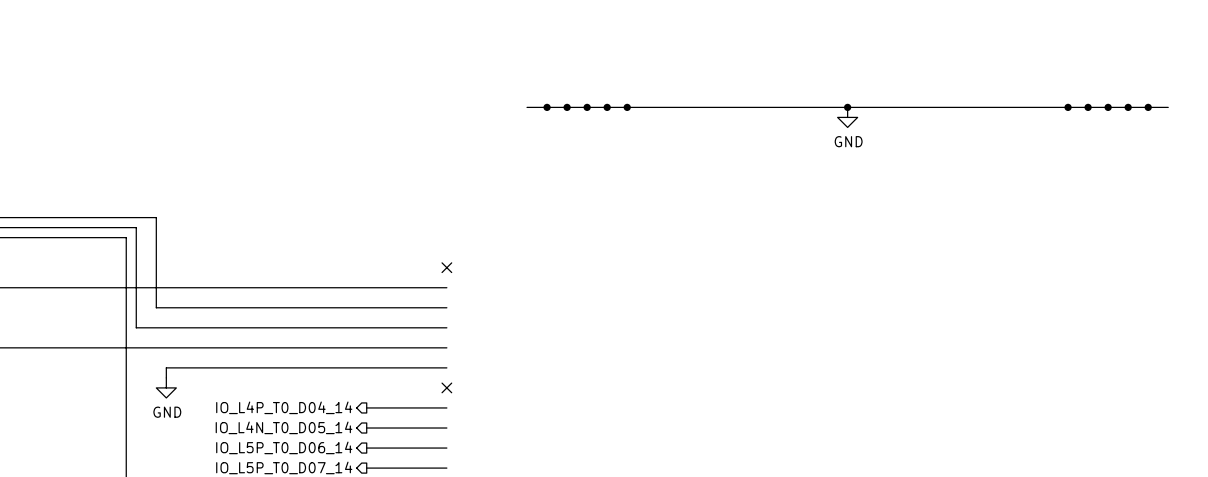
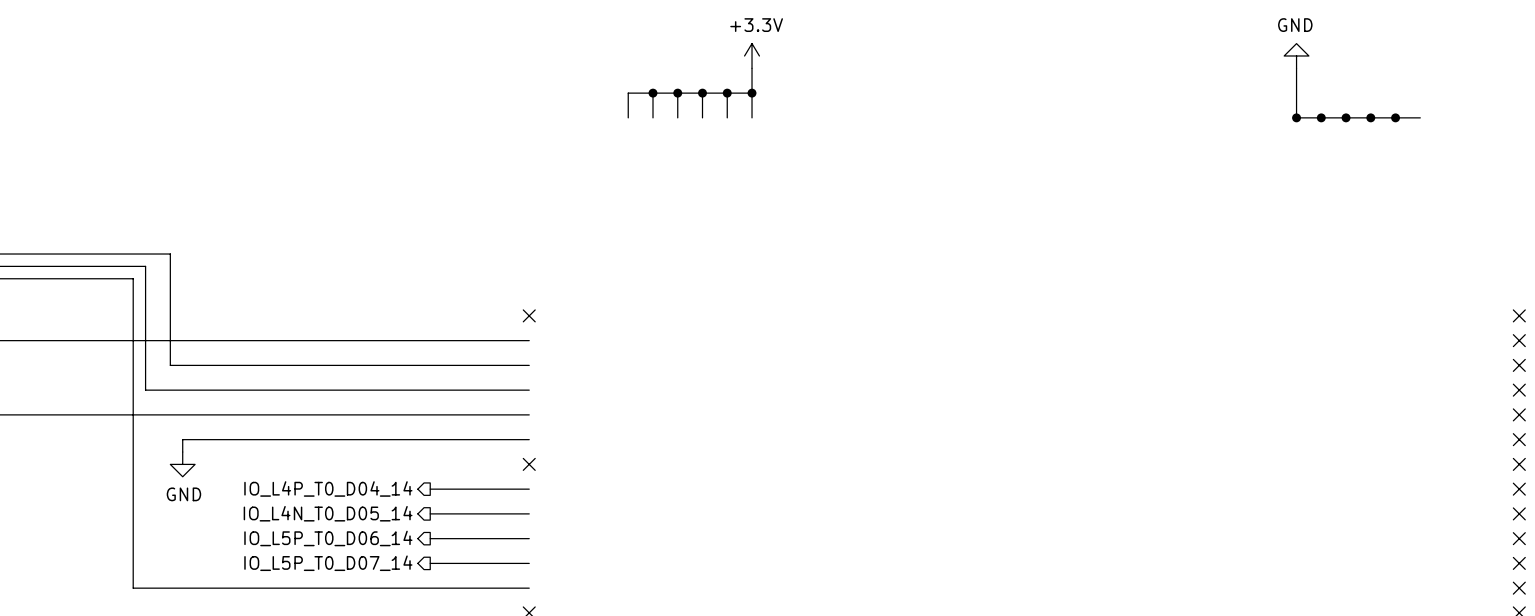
power symbol: none -> +3.3V (752, 55)
power symbol: none -> GND (1296, 55)
wire: none -> (752, 68) (752, 117)
wire: none -> (1296, 68) (1296, 117)
wire: none -> (653, 93) (653, 117)
junction: none -> (653, 93)
wire: none -> (677, 93) (677, 117)
junction: none -> (677, 93)
wire: none -> (702, 93) (702, 117)
junction: none -> (702, 93)
wire: none -> (727, 93) (727, 117)
junction: none -> (727, 93)
junction: none -> (752, 93)
wire: (527, 107) (1068, 107) -> (628, 117) (628, 93) (752, 93)
junction: (547, 107) -> none
junction: (567, 107) -> none
junction: (587, 107) -> none
junction: (607, 107) -> none
junction: (627, 107) -> none
junction: (847, 107) -> none
power symbol: GND (847, 117) -> none

